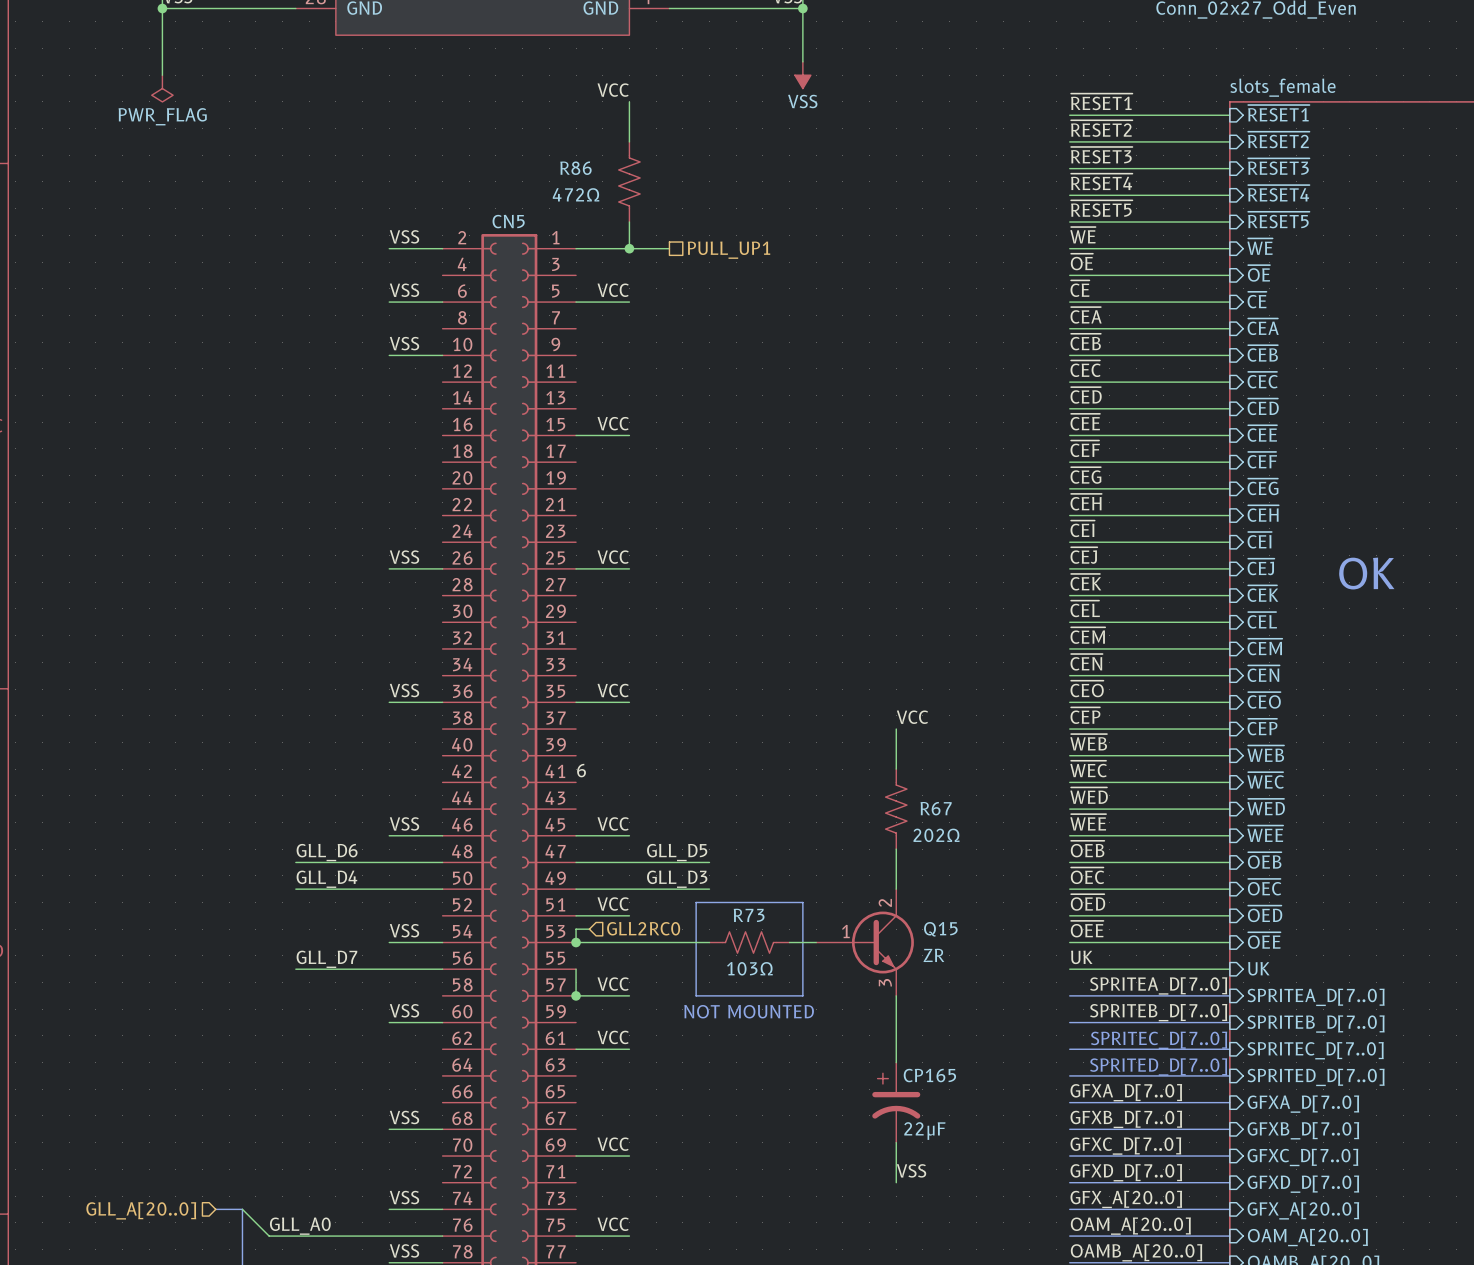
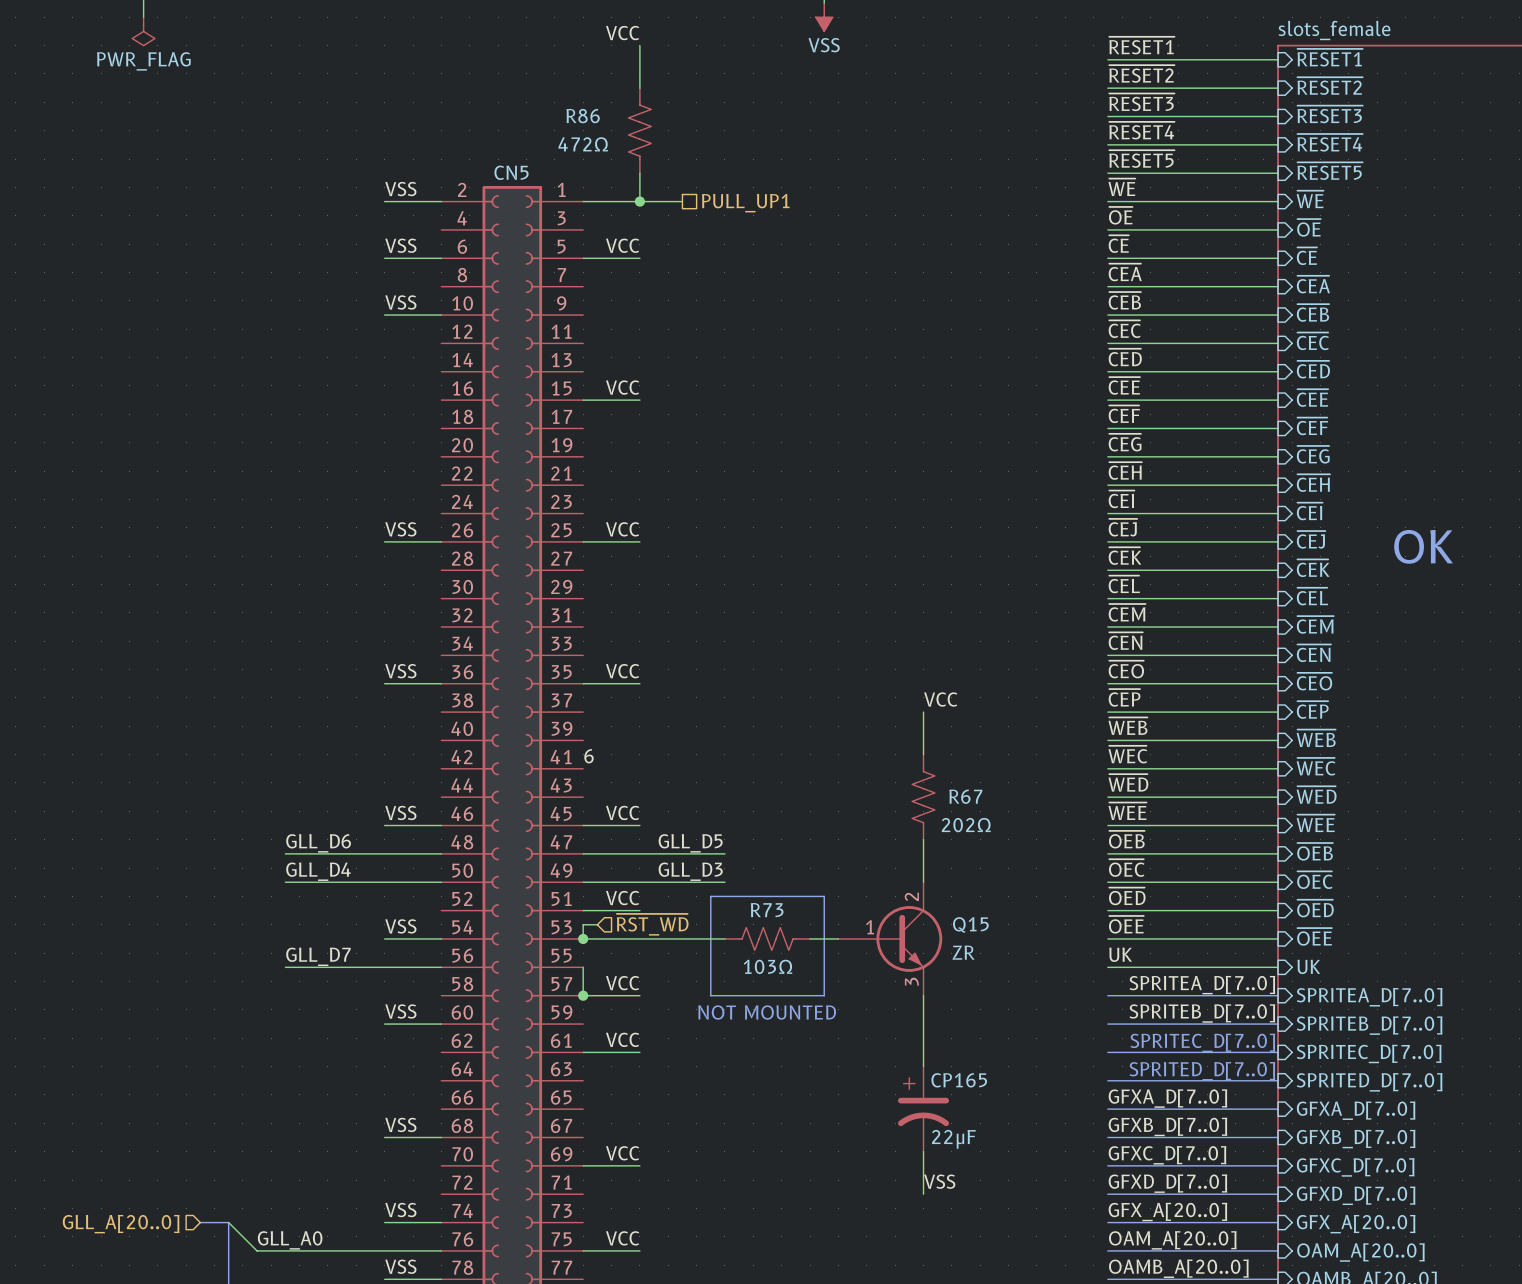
hierarchical label: GLL2RC0 (643, 928) -> ~{RST_WD} (652, 924)

